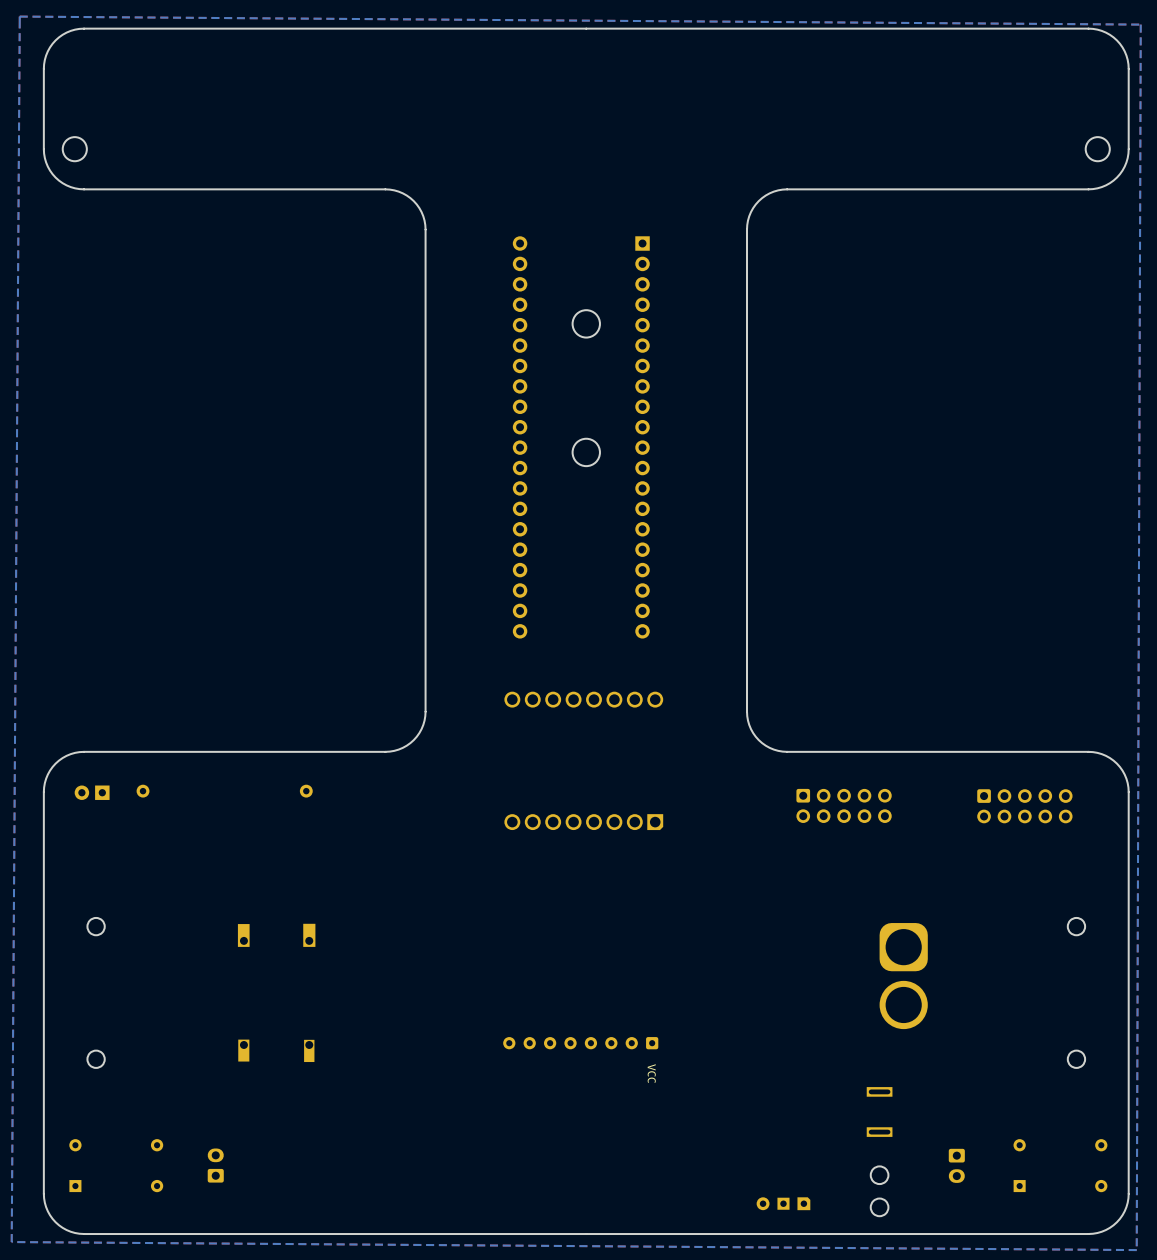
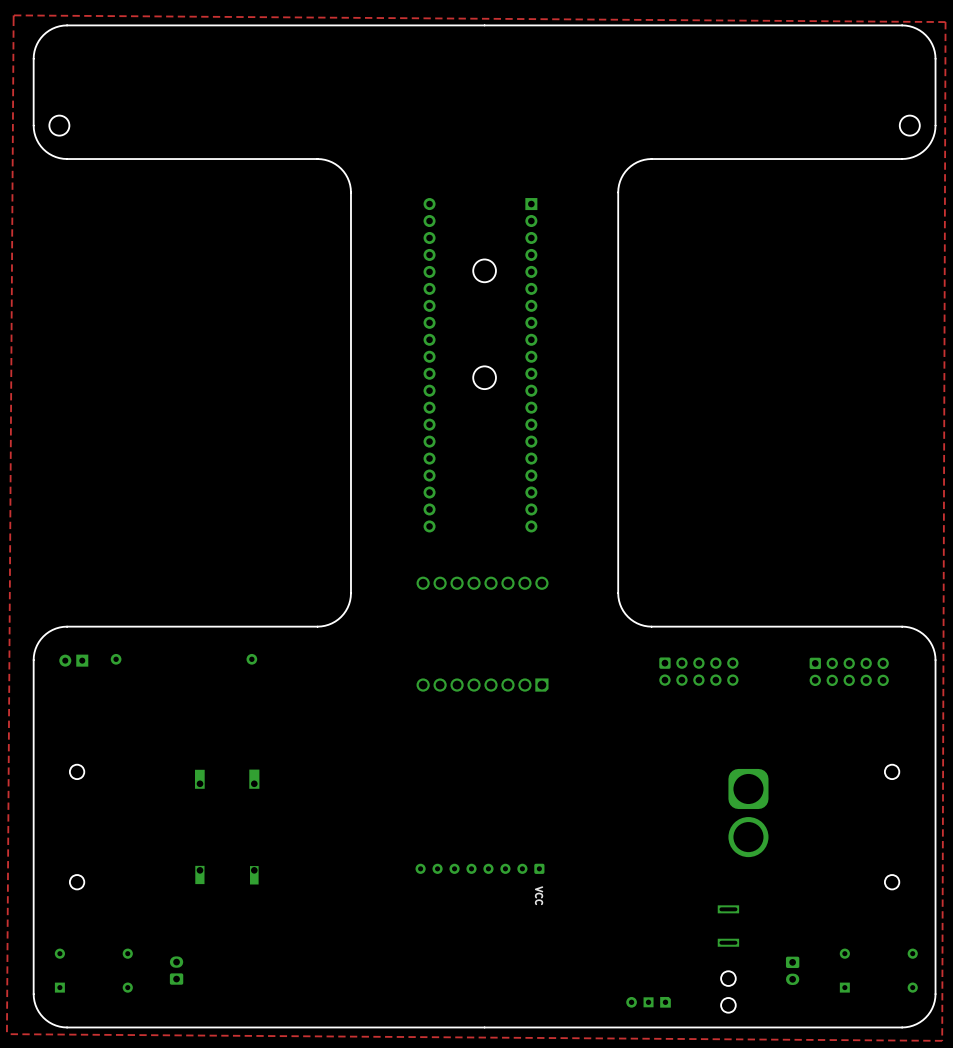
bottom zone outline: (19, 16) (11, 1242) (1136, 1250) (1140, 24) (19, 16) -> none

